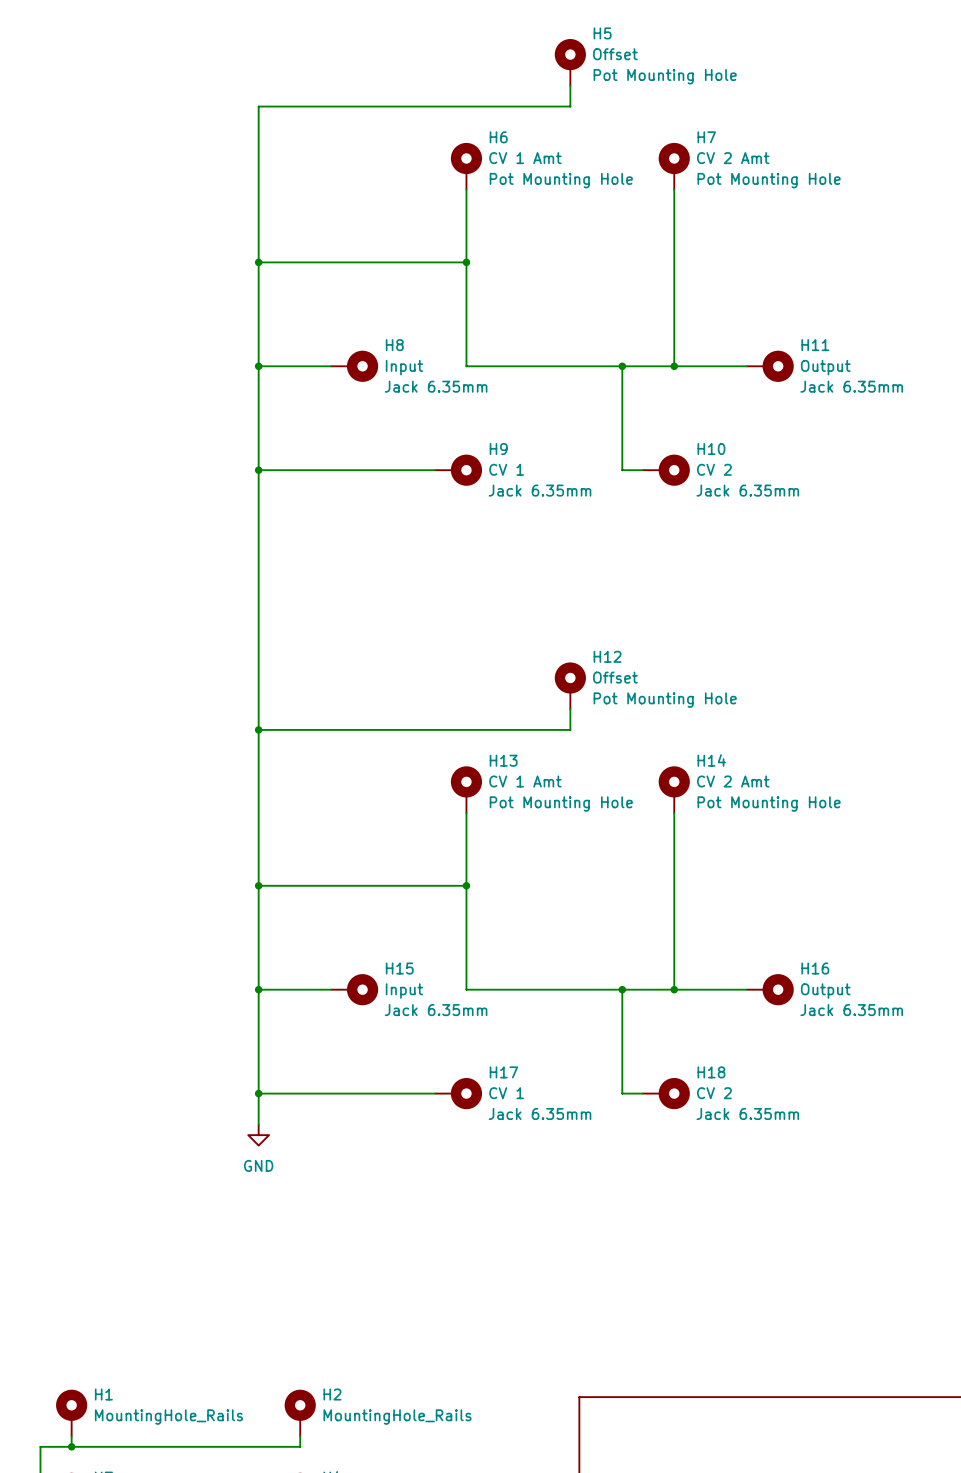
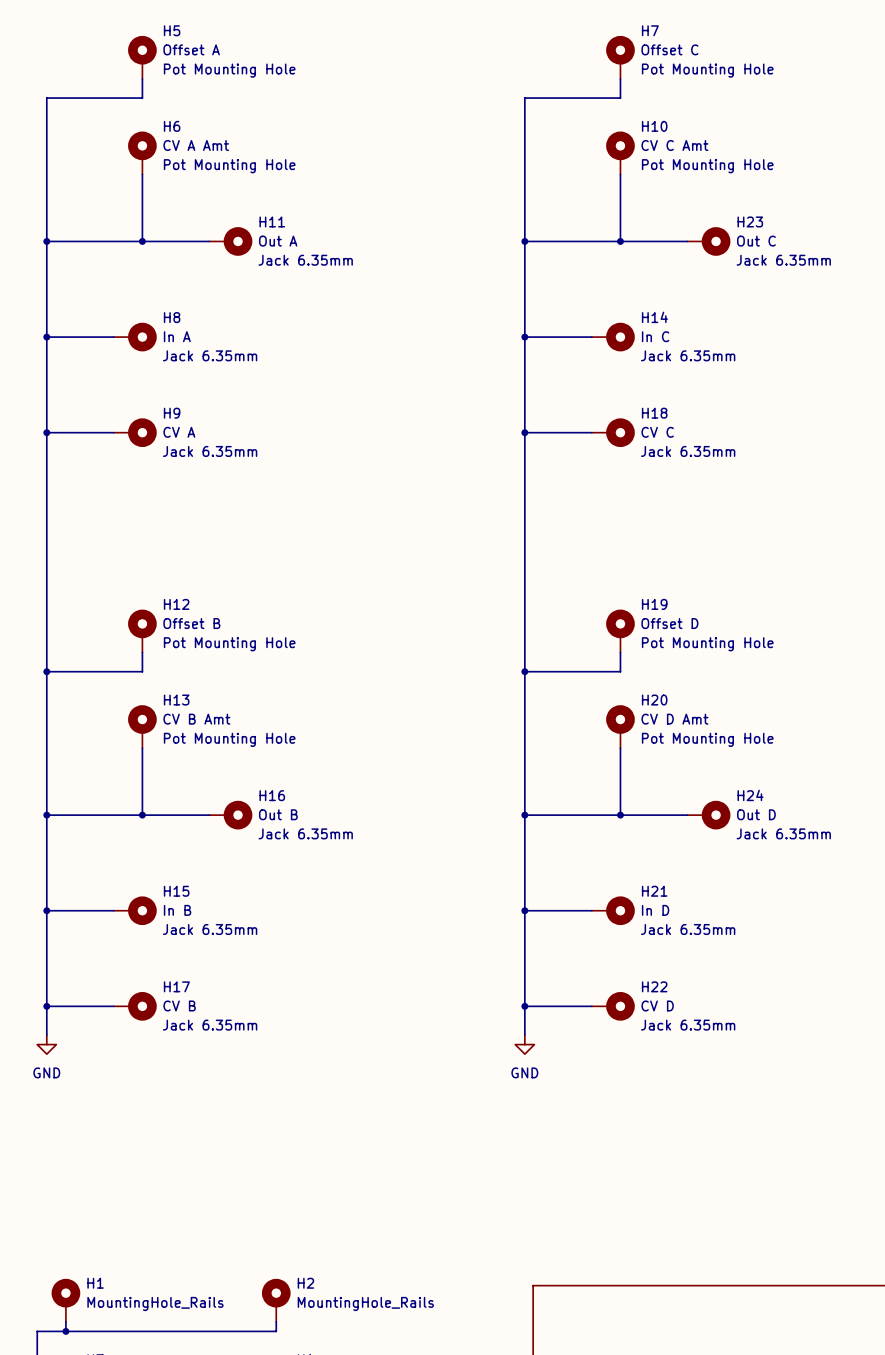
H5 value: Offset (615, 54) -> Offset A (191, 49)
H5 position: (570, 62) -> (142, 57)
H7: none -> Offset C (620, 57)
wire: none -> (142, 78) (142, 98) (46, 98) (46, 1035)
wire: (570, 85) (570, 106) (258, 106) (258, 1124) -> none
wire: none -> (620, 78) (620, 98) (524, 98) (524, 652)
H7 name: H7 (706, 137) -> H10 (654, 126)
H6 value: CV 1 Amt (525, 158) -> CV A Amt (196, 145)
H7 value: CV 2 Amt (733, 158) -> CV C Amt (674, 145)
H6 position: (466, 166) -> (142, 153)
wire: none -> (142, 174) (142, 241)
wire: (466, 189) (466, 366) (570, 366) -> none
wire: none -> (46, 241) (209, 241)
junction: none -> (46, 241)
junction: none -> (142, 241)
wire: (258, 262) (466, 262) -> none
junction: (258, 262) -> none
junction: (466, 262) -> none
wire: none -> (524, 241) (687, 241)
junction: none -> (524, 241)
wire: (674, 262) (674, 366) -> none
junction: none -> (620, 241)
H23: none -> Out C (708, 241)
wire: none -> (46, 337) (113, 337)
junction: none -> (46, 337)
wire: (258, 366) (331, 366) -> none
junction: (258, 366) -> none
H8 position: (354, 366) -> (135, 337)
junction: none -> (524, 337)
wire: (622, 366) (622, 470) -> (524, 432) (572, 432)
junction: (622, 366) -> none
wire: (643, 366) (746, 366) -> none
H14: none -> In C (613, 337)
junction: (674, 366) -> none
H11 position: (770, 366) -> (230, 241)
H8 value: Input (404, 367) -> In A (177, 336)
H11 value: Output (825, 367) -> Out A (278, 241)
H10 name: H10 (711, 449) -> H18 (654, 413)
H9 value: CV 1 (506, 469) -> CV A (179, 432)
H10 value: CV 2 (714, 469) -> CV C (657, 432)
wire: none -> (46, 432) (113, 432)
junction: none -> (46, 432)
wire: (258, 470) (435, 470) -> none
junction: (258, 470) -> none
H9 position: (458, 470) -> (135, 432)
junction: none -> (524, 432)
H12 value: Offset (615, 677) -> Offset B (191, 623)
H12 position: (570, 685) -> (142, 631)
H19: none -> Offset D (620, 631)
wire: none -> (142, 652) (142, 671) (46, 671)
wire: none -> (620, 652) (620, 671) (524, 671) (524, 1035)
junction: none -> (46, 671)
wire: (258, 729) (570, 729) -> none
junction: (258, 729) -> none
junction: none -> (524, 671)
H14 name: H14 (711, 760) -> H20 (654, 700)
H13 value: CV 1 Amt (525, 781) -> CV B Amt (196, 719)
H14 value: CV 2 Amt (733, 781) -> CV D Amt (674, 719)
H13 position: (466, 789) -> (142, 726)
wire: none -> (142, 748) (142, 815)
wire: (466, 813) (466, 989) (570, 989) -> none
wire: none -> (46, 815) (209, 815)
junction: none -> (46, 815)
junction: none -> (142, 815)
wire: (258, 885) (466, 885) -> none
junction: (258, 885) -> none
junction: (466, 885) -> none
wire: none -> (524, 815) (687, 815)
junction: none -> (524, 815)
wire: (674, 885) (674, 989) -> none
junction: none -> (620, 815)
H24: none -> Out D (708, 815)
wire: none -> (46, 910) (113, 910)
junction: none -> (46, 910)
wire: (258, 989) (331, 989) -> none
junction: (258, 989) -> none
H15 position: (354, 989) -> (135, 910)
junction: none -> (524, 910)
wire: (622, 989) (622, 1093) -> (524, 1006) (572, 1006)
junction: (622, 989) -> none
wire: (643, 989) (746, 989) -> none
H21: none -> In D (613, 910)
junction: (674, 989) -> none
H16 position: (770, 989) -> (230, 815)
H15 value: Input (404, 991) -> In B (177, 910)
H16 value: Output (825, 991) -> Out B (278, 814)
H18 name: H18 (711, 1072) -> H22 (654, 986)
wire: none -> (46, 1006) (113, 1006)
junction: none -> (46, 1006)
wire: (258, 1093) (435, 1093) -> none
junction: (258, 1093) -> none
H17 position: (458, 1093) -> (135, 1006)
H17 value: CV 1 (506, 1093) -> CV B (179, 1005)
junction: none -> (524, 1006)
H18 value: CV 2 (714, 1093) -> CV D (657, 1005)
power symbol: none -> GND (46, 1044)
power symbol: GND (258, 1135) -> none
power symbol: none -> GND (524, 1044)

